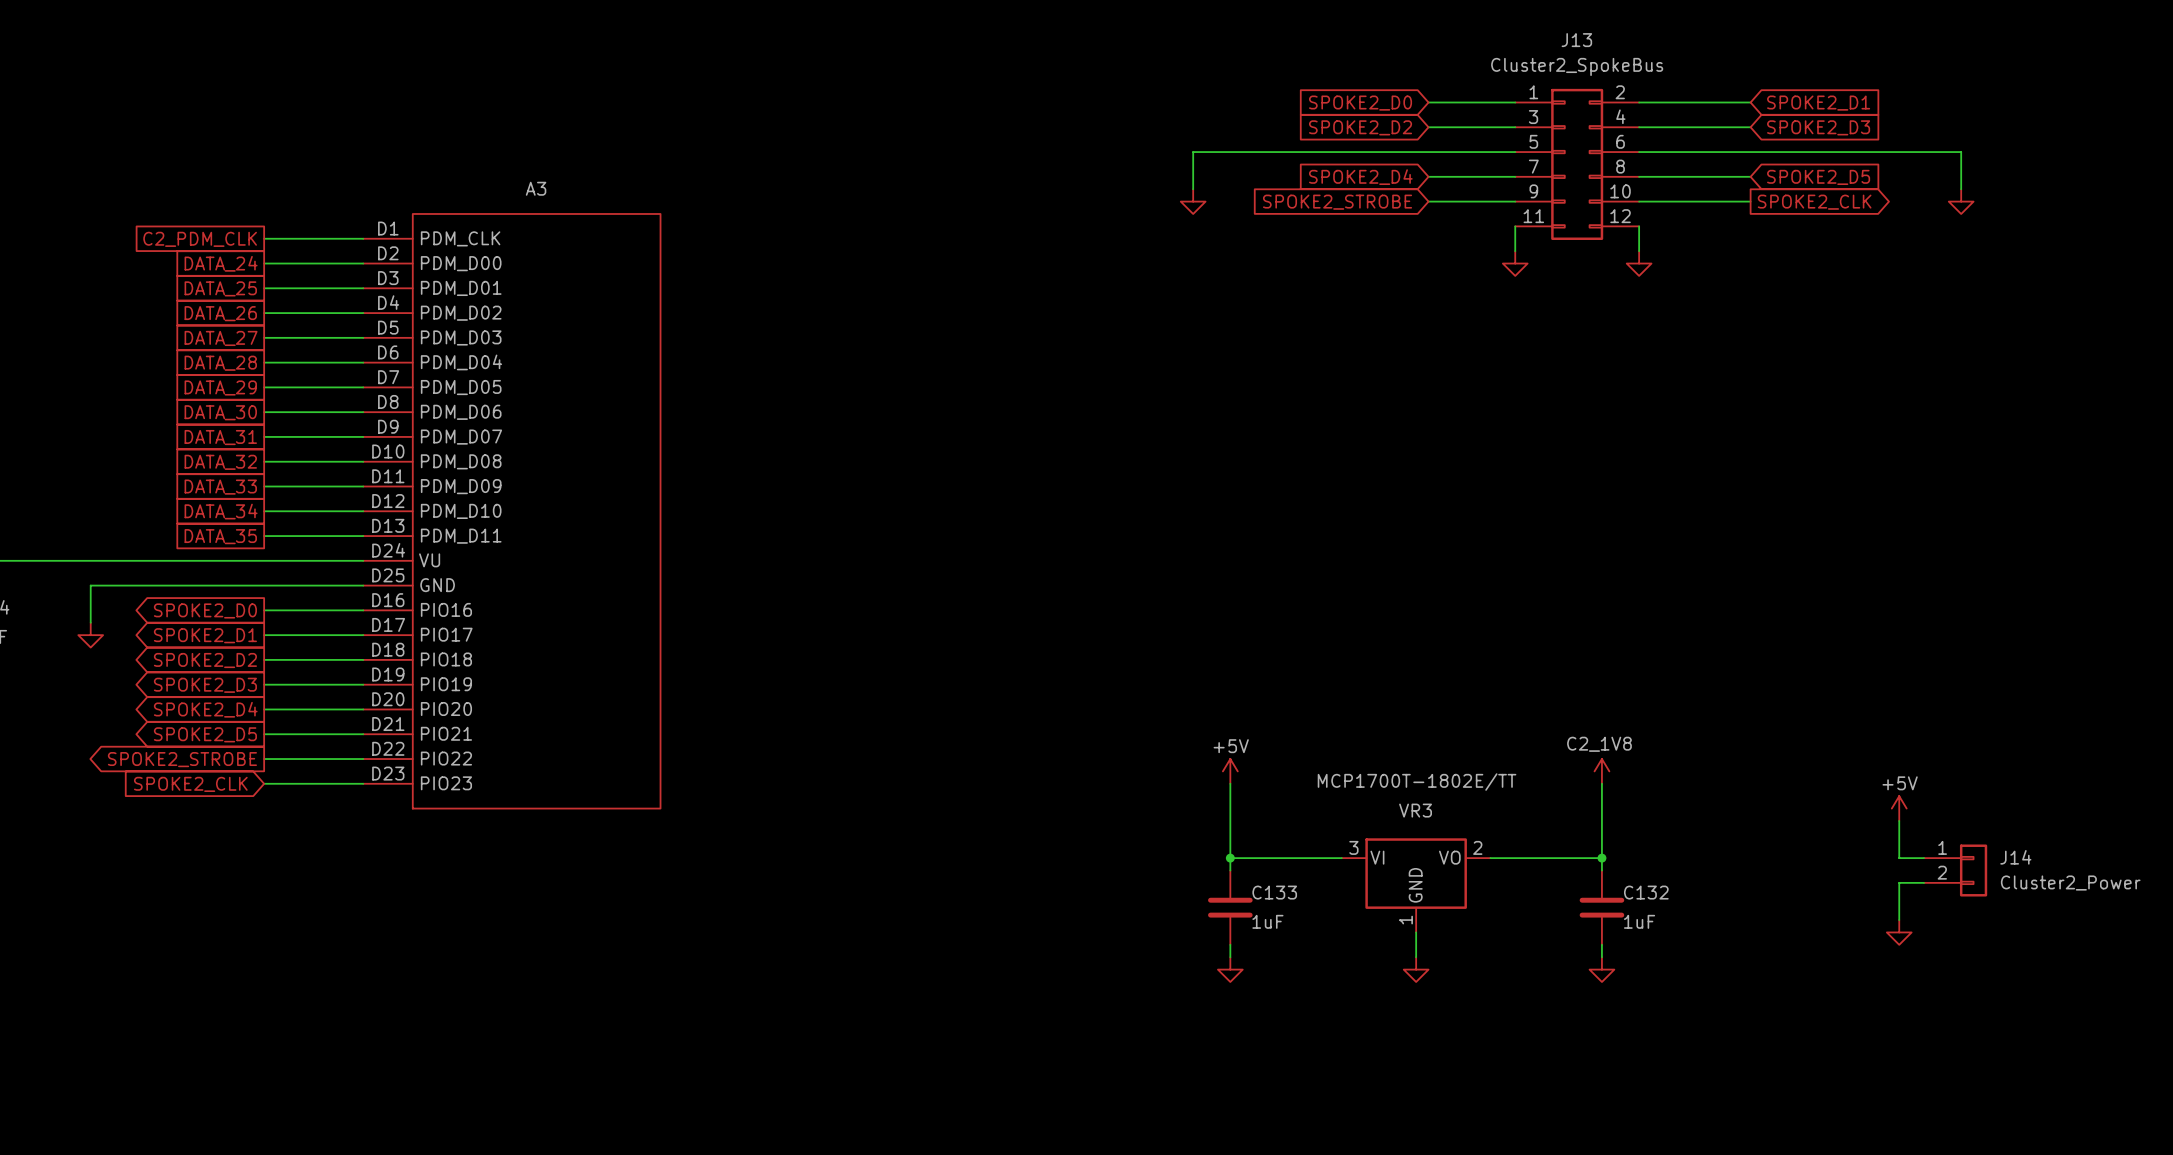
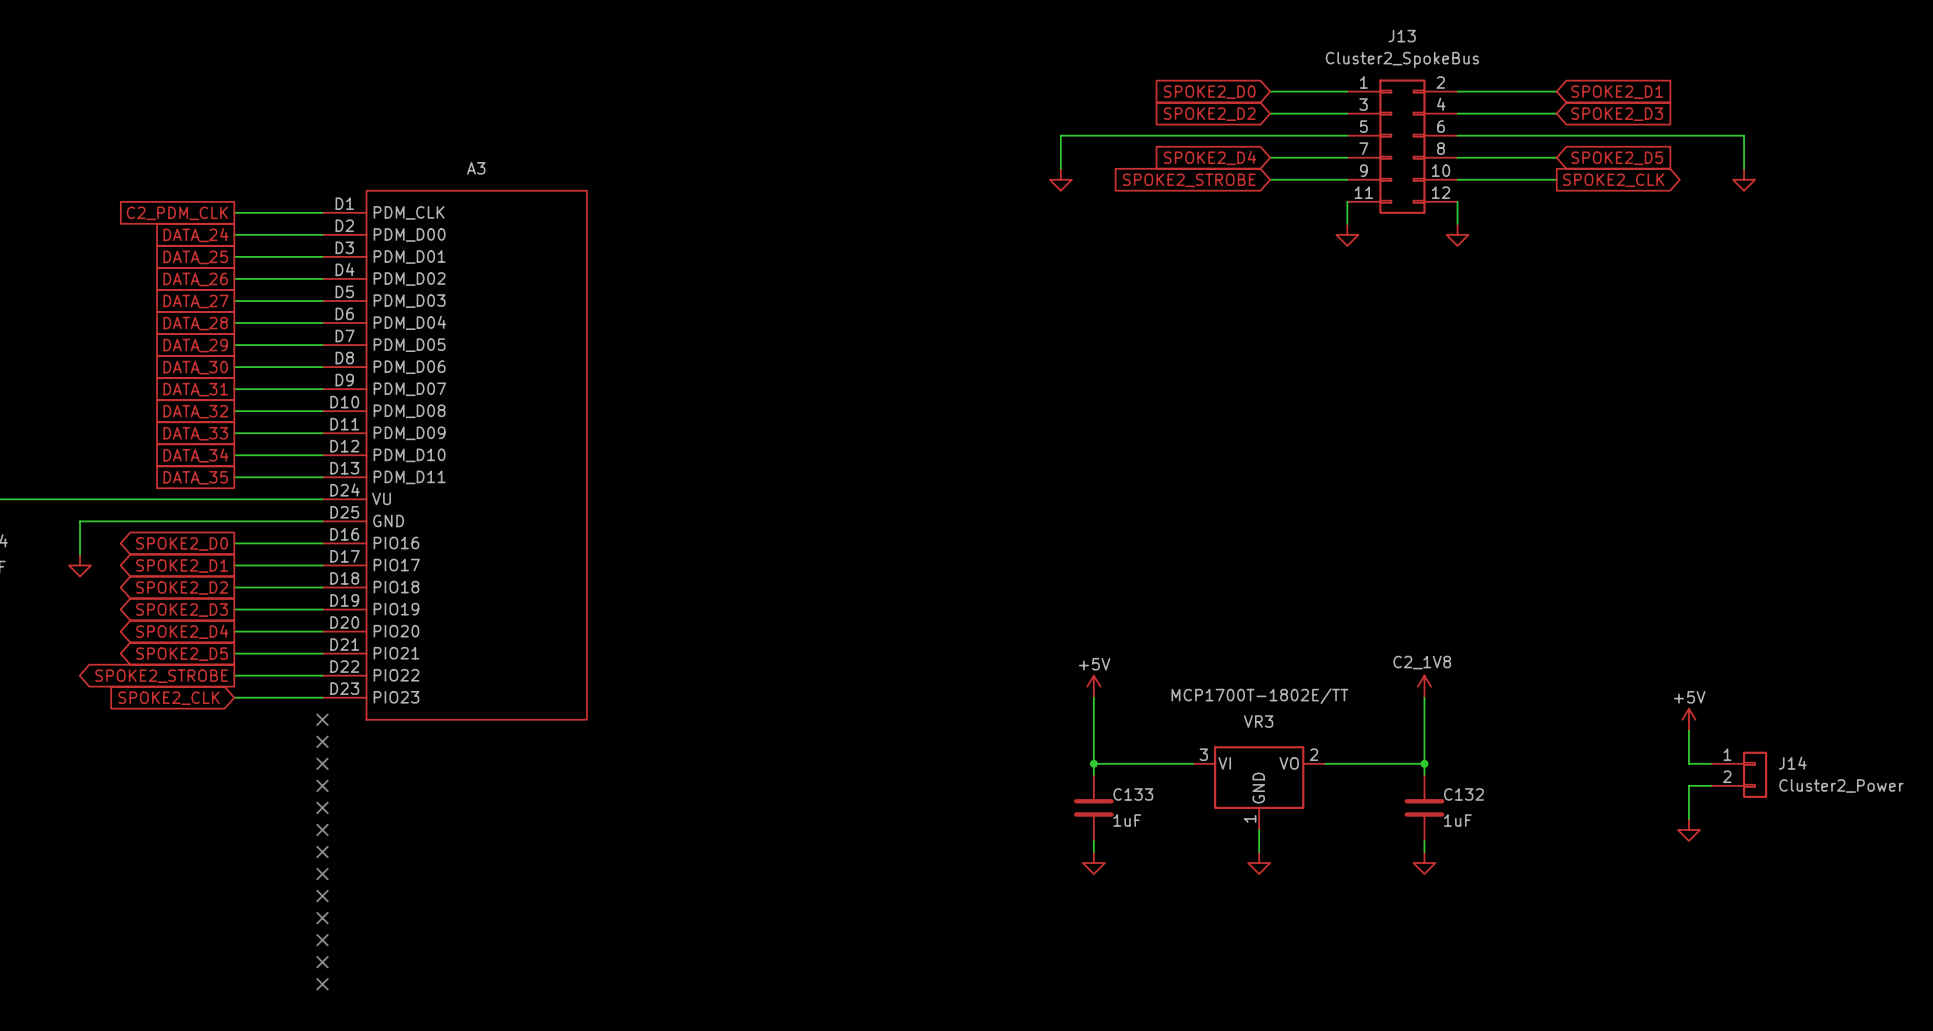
no-connect mark: none -> (322, 719)
no-connect mark: none -> (322, 741)
no-connect mark: none -> (322, 763)
no-connect mark: none -> (322, 785)
no-connect mark: none -> (322, 807)
no-connect mark: none -> (322, 829)
no-connect mark: none -> (322, 851)
no-connect mark: none -> (322, 874)
no-connect mark: none -> (322, 896)
no-connect mark: none -> (322, 918)
no-connect mark: none -> (322, 940)
no-connect mark: none -> (322, 962)
no-connect mark: none -> (322, 984)

